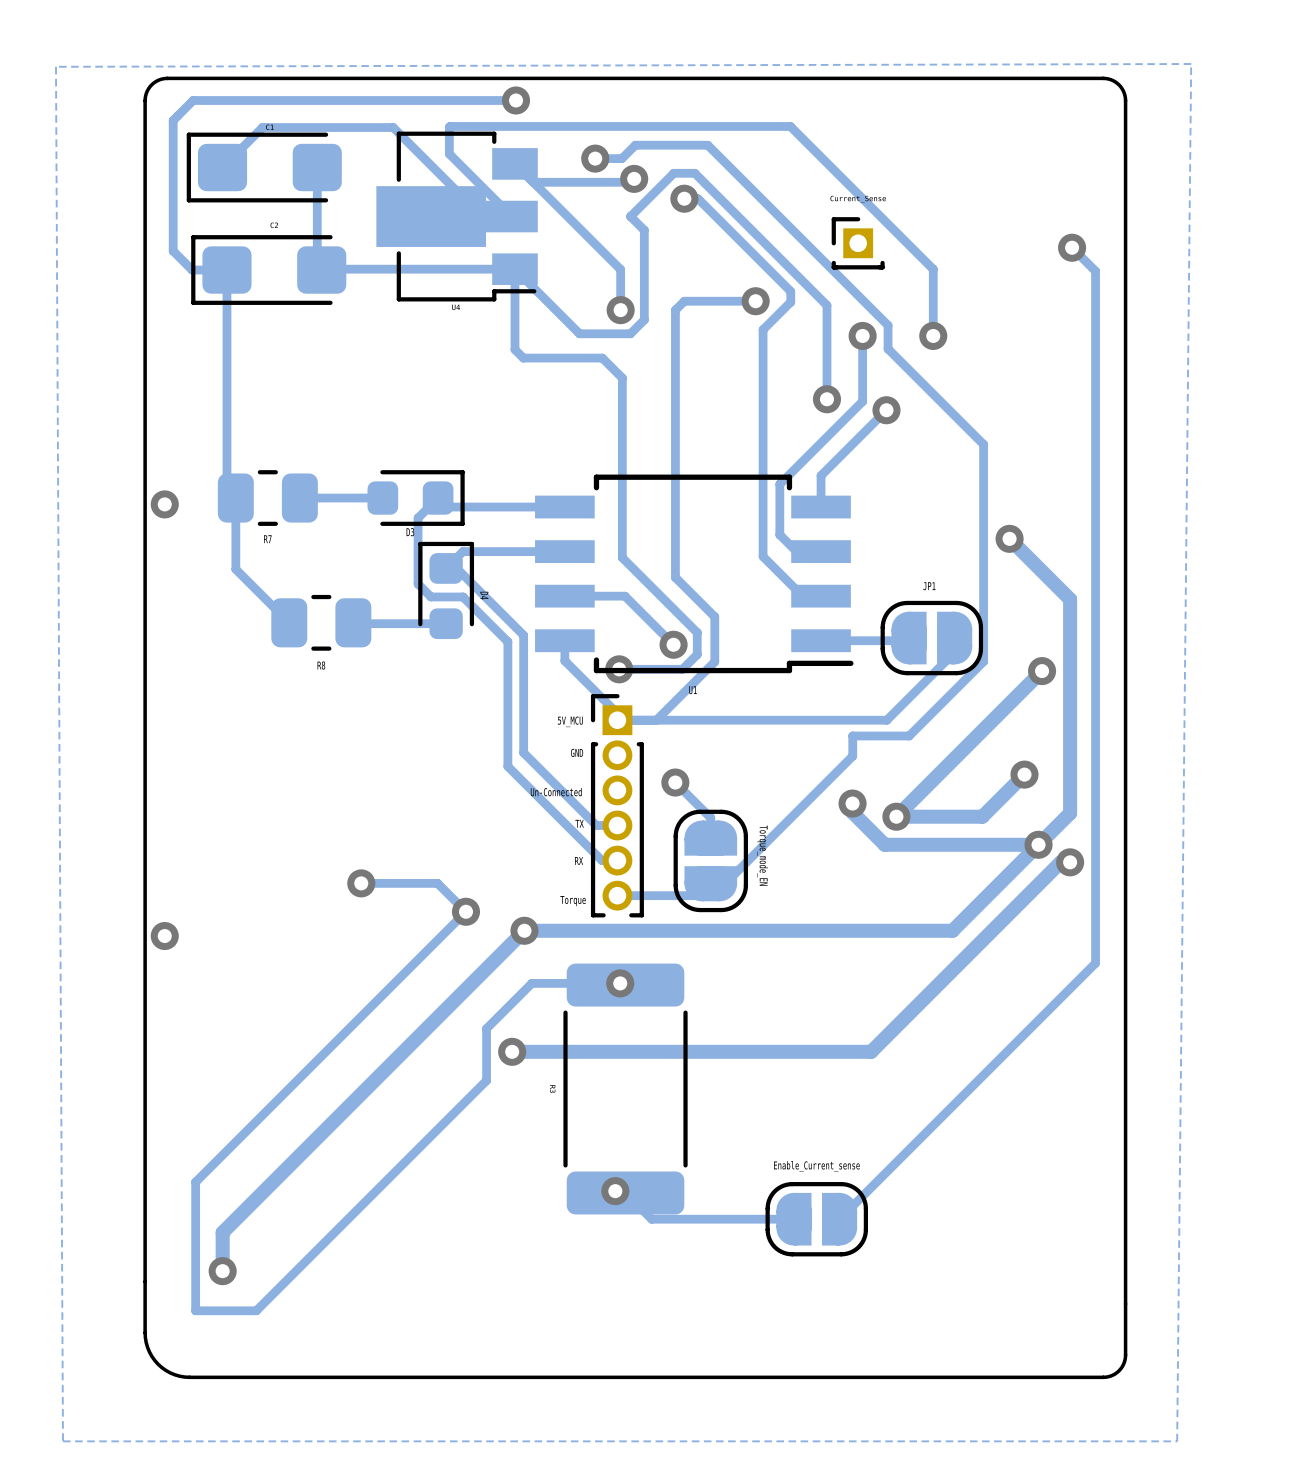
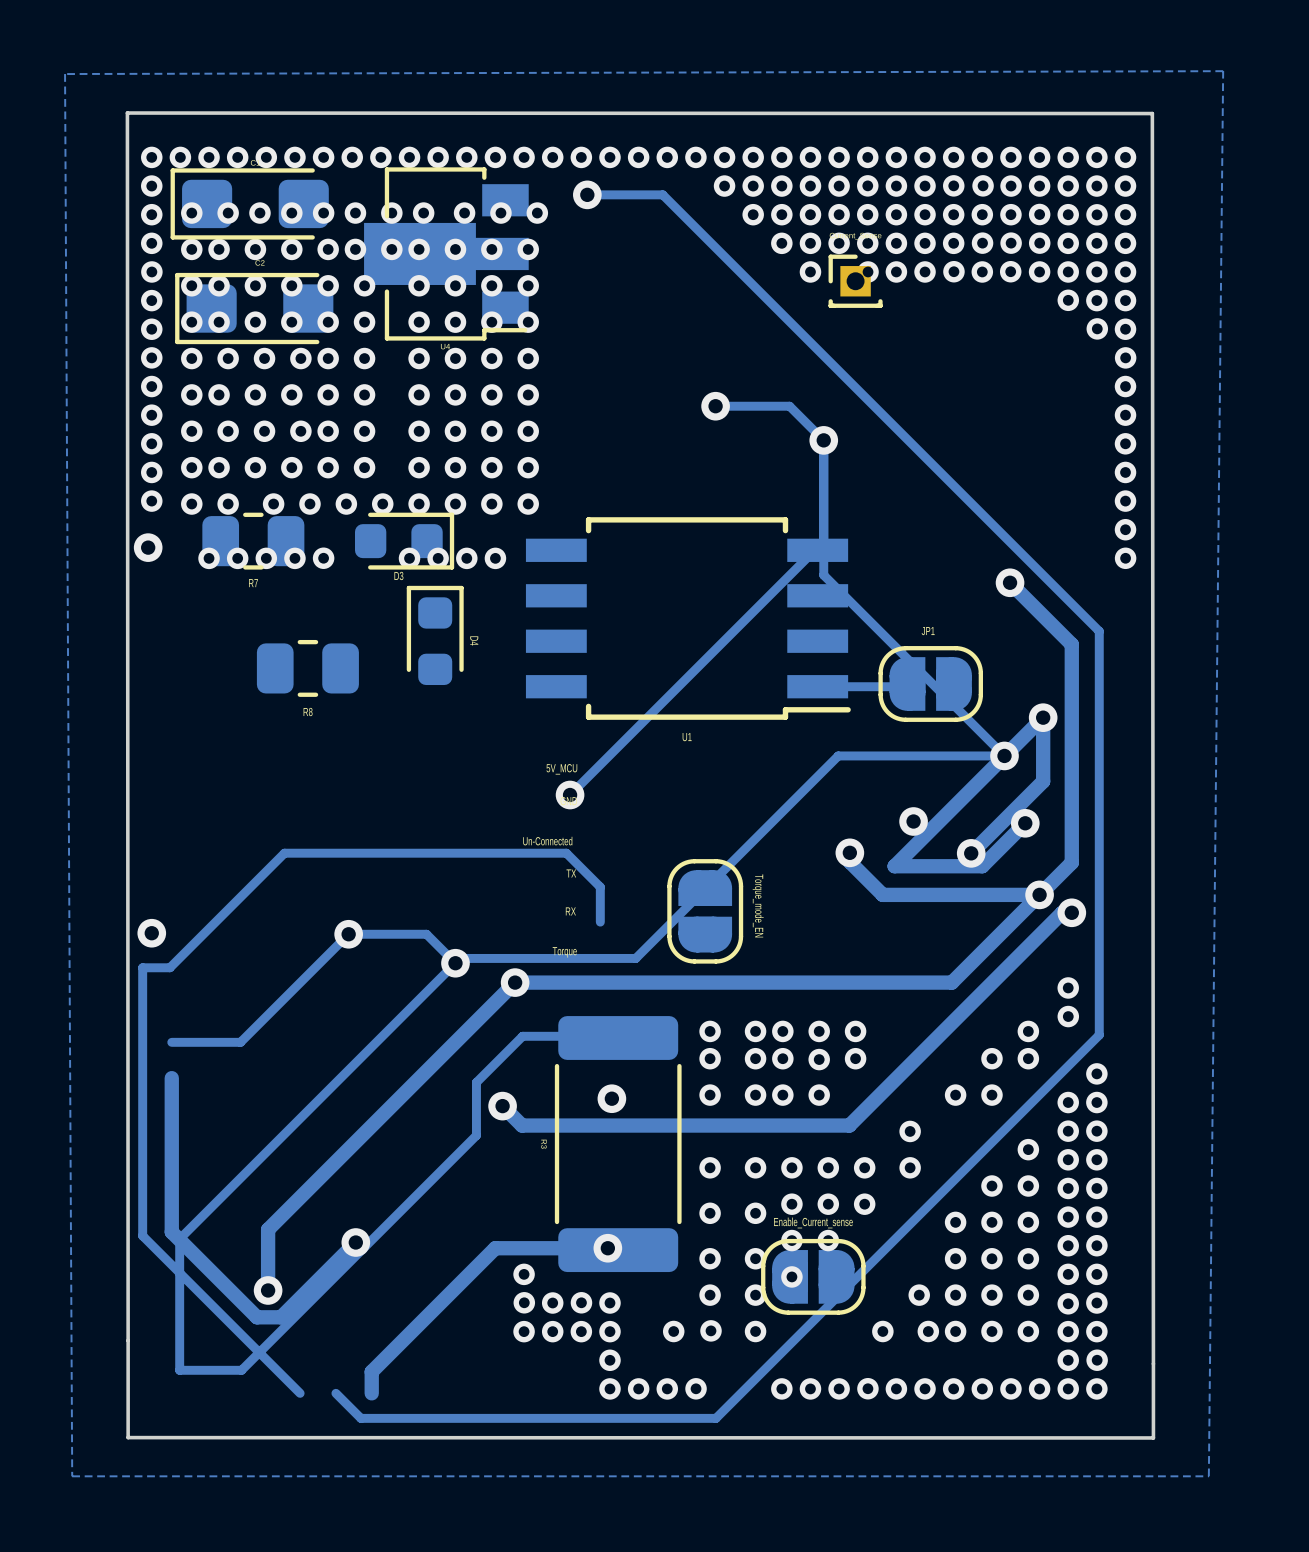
zone outline: (1191, 64) (1177, 1441) (63, 1441) (55, 66) (1191, 64) -> (1223, 71) (1208, 1476) (72, 1476) (65, 74) (1223, 71)
track: (516, 100) (193, 100) (173, 120) (173, 251) (192, 270) (226, 270) (226, 489) (235, 498) (235, 569) (289, 622) -> none
via: (516, 100) -> none
via: none -> (151, 157)
via: none -> (180, 157)
via: none -> (209, 157)
via: none -> (237, 157)
via: none -> (266, 157)
via: none -> (294, 157)
via: none -> (323, 157)
via: none -> (352, 157)
via: none -> (380, 157)
via: none -> (409, 157)
via: none -> (438, 157)
via: none -> (466, 157)
via: none -> (495, 157)
via: none -> (524, 157)
via: none -> (552, 157)
via: none -> (581, 157)
via: none -> (609, 157)
via: none -> (638, 157)
via: none -> (667, 157)
via: none -> (695, 157)
via: none -> (724, 157)
via: none -> (753, 157)
via: none -> (781, 157)
via: none -> (810, 157)
via: none -> (839, 157)
via: none -> (867, 157)
via: none -> (896, 157)
via: none -> (925, 157)
via: none -> (953, 157)
via: none -> (982, 157)
via: none -> (1010, 157)
via: none -> (1039, 157)
via: none -> (1068, 157)
via: none -> (1096, 157)
via: none -> (1125, 157)
via: none -> (151, 186)
via: none -> (724, 186)
via: none -> (753, 186)
via: none -> (781, 186)
via: none -> (810, 186)
via: none -> (839, 186)
via: none -> (867, 185)
via: none -> (896, 186)
via: none -> (925, 186)
via: none -> (953, 185)
via: none -> (983, 185)
via: none -> (1011, 186)
via: none -> (1039, 186)
via: none -> (1068, 186)
via: none -> (1096, 186)
via: none -> (1125, 186)
track: (621, 158) (635, 145) (707, 145) (888, 325) (888, 348) (983, 444) (983, 661) (909, 735) (852, 735) (852, 756) (725, 883) (710, 883) (698, 895) (617, 895) -> (614, 194) (662, 194) (1099, 631) (1099, 1035) (715, 1418) (360, 1418) (335, 1393)
track: (514, 163) (620, 269) (620, 310) -> none
track: (222, 167) (262, 127) (393, 127) (482, 216) (511, 216) (449, 153) (450, 126) (790, 126) (933, 269) (933, 335) -> none
track: (317, 167) (317, 265) (321, 270) (514, 269) -> none
via: none -> (191, 213)
via: none -> (228, 213)
via: none -> (259, 213)
via: none -> (291, 213)
via: none -> (323, 213)
via: none -> (355, 213)
via: none -> (391, 213)
via: none -> (423, 213)
via: none -> (464, 213)
via: none -> (500, 213)
via: none -> (537, 213)
via: none -> (1039, 214)
via: none -> (151, 214)
track: (634, 178) (630, 182) (533, 182) -> none
via: (634, 178) -> none
via: none -> (753, 214)
via: none -> (781, 214)
via: none -> (810, 214)
via: none -> (839, 214)
via: none -> (867, 214)
via: none -> (896, 214)
via: none -> (925, 214)
via: none -> (953, 214)
via: none -> (982, 214)
via: none -> (1010, 214)
via: none -> (1068, 214)
via: none -> (1096, 214)
via: none -> (1125, 214)
track: (684, 198) (698, 198) (790, 291) (790, 302) (763, 329) (763, 556) (802, 596) (821, 596) -> none
via: (684, 198) -> none
via: none -> (982, 243)
via: none -> (1011, 243)
via: none -> (1039, 243)
via: none -> (151, 243)
via: none -> (781, 243)
via: none -> (810, 243)
via: none -> (839, 243)
via: none -> (867, 243)
via: none -> (896, 243)
via: none -> (925, 243)
via: none -> (953, 243)
via: none -> (1068, 243)
via: none -> (1096, 243)
via: none -> (1125, 243)
via: none -> (191, 249)
via: none -> (219, 249)
via: none -> (255, 249)
via: none -> (291, 249)
via: none -> (328, 249)
via: none -> (355, 249)
via: none -> (391, 249)
via: none -> (419, 249)
via: none -> (455, 249)
via: none -> (491, 249)
via: none -> (528, 249)
via: none -> (953, 271)
via: none -> (1010, 271)
via: none -> (151, 271)
via: none -> (810, 271)
via: none -> (868, 271)
via: none -> (896, 271)
via: none -> (925, 271)
via: none -> (982, 271)
via: none -> (1039, 271)
via: none -> (1068, 271)
via: none -> (1096, 271)
via: none -> (1125, 271)
via: none -> (191, 285)
via: none -> (219, 285)
via: none -> (255, 285)
via: none -> (291, 285)
via: none -> (328, 285)
via: none -> (364, 285)
via: none -> (419, 285)
via: none -> (455, 285)
via: none -> (491, 285)
via: none -> (528, 285)
track: (1072, 247) (1095, 271) (1095, 963) (839, 1219) -> none
via: (1072, 247) -> none
via: none -> (1068, 300)
via: none -> (151, 300)
via: none -> (1096, 300)
via: none -> (1125, 300)
track: (514, 269) (514, 349) (523, 358) (602, 358) (622, 378) (622, 557) (697, 632) (697, 654) (682, 669) (620, 670) -> none
track: (514, 269) (579, 333) (630, 333) (644, 319) (644, 230) (630, 216) (673, 173) (694, 173) (826, 305) (826, 399) -> none
via: none -> (191, 322)
via: none -> (219, 322)
via: none -> (255, 322)
via: none -> (291, 322)
via: none -> (328, 322)
via: none -> (364, 322)
via: none -> (419, 322)
via: none -> (455, 322)
via: none -> (491, 322)
via: none -> (528, 322)
via: none -> (1097, 328)
via: none -> (151, 329)
via: none -> (1125, 329)
track: (755, 301) (684, 301) (675, 310) (675, 577) (714, 616) (714, 661) (656, 720) -> none
via: (755, 301) -> none
via: (620, 310) -> none
via: none -> (151, 357)
via: none -> (1125, 357)
via: none -> (191, 358)
via: none -> (228, 358)
via: none -> (264, 358)
via: none -> (300, 358)
via: none -> (328, 358)
via: none -> (364, 358)
via: none -> (419, 358)
via: none -> (455, 358)
via: none -> (491, 358)
via: none -> (528, 358)
track: (862, 335) (862, 401) (779, 484) (779, 534) (796, 551) (821, 551) -> none
via: (862, 335) -> none
via: (933, 335) -> none
via: none -> (151, 386)
via: none -> (1125, 386)
via: none -> (191, 394)
via: none -> (219, 394)
via: none -> (255, 394)
via: none -> (291, 394)
via: none -> (328, 394)
via: none -> (364, 394)
via: none -> (419, 394)
via: none -> (455, 394)
via: none -> (491, 394)
via: none -> (528, 394)
track: none -> (715, 406) (789, 406) (823, 440) (823, 575) (1004, 755) (838, 755) (635, 958) (460, 958) (455, 963)
via: none -> (715, 406)
via: none -> (151, 415)
via: none -> (1125, 415)
via: none -> (191, 431)
via: none -> (228, 431)
via: none -> (264, 431)
via: none -> (300, 431)
via: none -> (328, 431)
via: none -> (364, 431)
via: none -> (419, 431)
via: none -> (455, 431)
via: none -> (491, 431)
via: none -> (528, 431)
via: none -> (151, 443)
via: none -> (1125, 443)
track: (886, 410) (821, 475) (821, 507) (802, 507) -> none
via: (886, 410) -> none
via: none -> (191, 467)
via: none -> (219, 467)
via: none -> (255, 467)
via: none -> (291, 467)
via: none -> (328, 467)
via: none -> (364, 467)
via: none -> (419, 467)
via: none -> (455, 467)
via: none -> (491, 467)
via: none -> (528, 467)
via: none -> (151, 472)
via: none -> (1125, 472)
via: none -> (151, 501)
via: none -> (1125, 501)
via: none -> (191, 504)
via: none -> (228, 504)
via: none -> (273, 504)
via: none -> (309, 504)
via: none -> (346, 504)
via: none -> (382, 504)
via: none -> (419, 504)
via: none -> (455, 504)
via: none -> (491, 504)
via: none -> (528, 504)
via: none -> (1125, 529)
track: (382, 498) (299, 498) -> none
track: none -> (823, 541) (570, 795)
track: (564, 507) (447, 507) (438, 498) (418, 518) (418, 584) (431, 596) (463, 596) (507, 641) (507, 766) (601, 860) (617, 860) -> none
via: none -> (209, 558)
via: none -> (237, 558)
via: none -> (266, 558)
via: none -> (294, 558)
via: none -> (323, 558)
via: none -> (409, 558)
via: none -> (438, 558)
via: none -> (466, 558)
via: none -> (495, 558)
via: none -> (1125, 558)
track: (564, 551) (462, 551) (446, 568) (456, 568) (523, 635) (523, 752) (596, 825) (617, 825) -> none
track: (564, 596) (624, 596) (673, 644) -> none
track: (353, 622) (446, 623) -> none
track: (954, 638) (954, 652) (886, 720) (617, 720) (617, 713) (564, 660) (564, 640) -> none
via: (673, 644) -> none
via: (619, 669) -> none
track: none -> (1043, 717) (1043, 781) (971, 853)
via: none -> (1004, 755)
via: none -> (570, 795)
via: none -> (913, 821)
track: (675, 782) (710, 817) (710, 838) -> none
via: (675, 782) -> none
via: none -> (971, 853)
part: (617, 805) -> none
via: (896, 816) -> none
track: none -> (600, 922) (600, 887) (566, 853) (284, 853) (169, 967) (142, 967) (142, 1235) (300, 1393)
track: none -> (348, 934) (240, 1042) (171, 1042)
via position: (164, 936) -> (151, 933)
via: none -> (1068, 987)
via: none -> (1068, 1016)
via: none -> (710, 1031)
via: none -> (755, 1031)
via: none -> (782, 1031)
via: none -> (819, 1031)
via: none -> (855, 1031)
via: none -> (1028, 1031)
via position: (620, 983) -> (611, 1098)
via: none -> (710, 1058)
via: none -> (755, 1058)
via: none -> (782, 1058)
via: none -> (855, 1058)
via: none -> (991, 1058)
via: none -> (1028, 1058)
via: none -> (819, 1059)
via: none -> (1096, 1073)
track: none -> (171, 1078) (171, 1232) (256, 1317) (281, 1317) (355, 1242)
via: none -> (710, 1095)
via: none -> (755, 1095)
via: none -> (782, 1095)
via: none -> (819, 1095)
via: none -> (955, 1095)
via: none -> (991, 1095)
via: none -> (1068, 1102)
via: none -> (1096, 1102)
track: (871, 1051) (512, 1051) -> (868, 1106) (849, 1125) (522, 1125) (502, 1106)
via: none -> (910, 1131)
via: none -> (1068, 1131)
via: none -> (1096, 1131)
via: none -> (1028, 1149)
via: none -> (1068, 1159)
via: none -> (1096, 1159)
via: none -> (710, 1167)
via: none -> (755, 1167)
via: none -> (791, 1167)
via: none -> (828, 1167)
via: none -> (864, 1167)
via: none -> (910, 1167)
via: none -> (991, 1186)
via: none -> (1028, 1186)
via: none -> (1068, 1188)
via: none -> (1096, 1188)
via: none -> (791, 1204)
via: none -> (828, 1204)
via: none -> (864, 1204)
via: none -> (710, 1213)
via: none -> (755, 1213)
via: none -> (1068, 1217)
via: none -> (1096, 1217)
via: none -> (955, 1222)
via: none -> (991, 1222)
via: none -> (1028, 1222)
track: (282, 1172) (222, 1232) (222, 1271) -> (268, 1229) (268, 1290)
via: none -> (791, 1240)
via: none -> (828, 1240)
via: none -> (355, 1242)
via: none -> (1068, 1245)
via: none -> (1096, 1245)
track: (625, 1192) (651, 1219) (793, 1219) -> (618, 1250) (616, 1248) (495, 1248) (371, 1371) (371, 1393)
via: none -> (710, 1258)
via: none -> (755, 1258)
via: none -> (955, 1258)
via: none -> (991, 1258)
via: none -> (1028, 1258)
via: none -> (524, 1274)
via: none -> (1068, 1274)
via: none -> (1096, 1274)
via: none -> (791, 1276)
via: none -> (710, 1295)
via: none -> (755, 1295)
via: none -> (919, 1295)
via: none -> (955, 1295)
via: none -> (991, 1295)
via: none -> (1028, 1295)
via: none -> (524, 1302)
via: none -> (552, 1303)
via: none -> (581, 1302)
via: none -> (609, 1303)
via: none -> (1096, 1303)
via: none -> (1068, 1303)
via position: (222, 1271) -> (268, 1290)
via: none -> (524, 1331)
via: none -> (552, 1331)
via: none -> (581, 1331)
via: none -> (609, 1331)
via: none -> (673, 1331)
via: none -> (711, 1330)
via: none -> (755, 1331)
via: none -> (882, 1331)
via: none -> (928, 1331)
via: none -> (955, 1331)
via: none -> (991, 1331)
via: none -> (1028, 1331)
via: none -> (1068, 1331)
via: none -> (1096, 1331)
board edge: (145, 1281) (145, 100) (149, 86) (157, 80) (167, 78) (1103, 78) (1117, 83) (1123, 91) (1125, 100) (1125, 1355) (1120, 1368) (1112, 1375) (1103, 1377) (189, 1377) (174, 1374) (158, 1364) (149, 1352) (145, 1332) -> (128, 1340) (127, 113) (1152, 113) (1153, 1437) (128, 1437) (128, 1392)
via: none -> (609, 1360)
via: none -> (1068, 1360)
via: none -> (1097, 1360)
via: none -> (696, 1388)
via: none -> (867, 1388)
via: none -> (609, 1388)
via: none -> (638, 1388)
via: none -> (667, 1388)
via: none -> (781, 1388)
via: none -> (810, 1388)
via: none -> (839, 1388)
via: none -> (896, 1388)
via: none -> (925, 1388)
via: none -> (953, 1388)
via: none -> (982, 1388)
via: none -> (1010, 1388)
via: none -> (1039, 1388)
via: none -> (1068, 1388)
via: none -> (1096, 1388)

